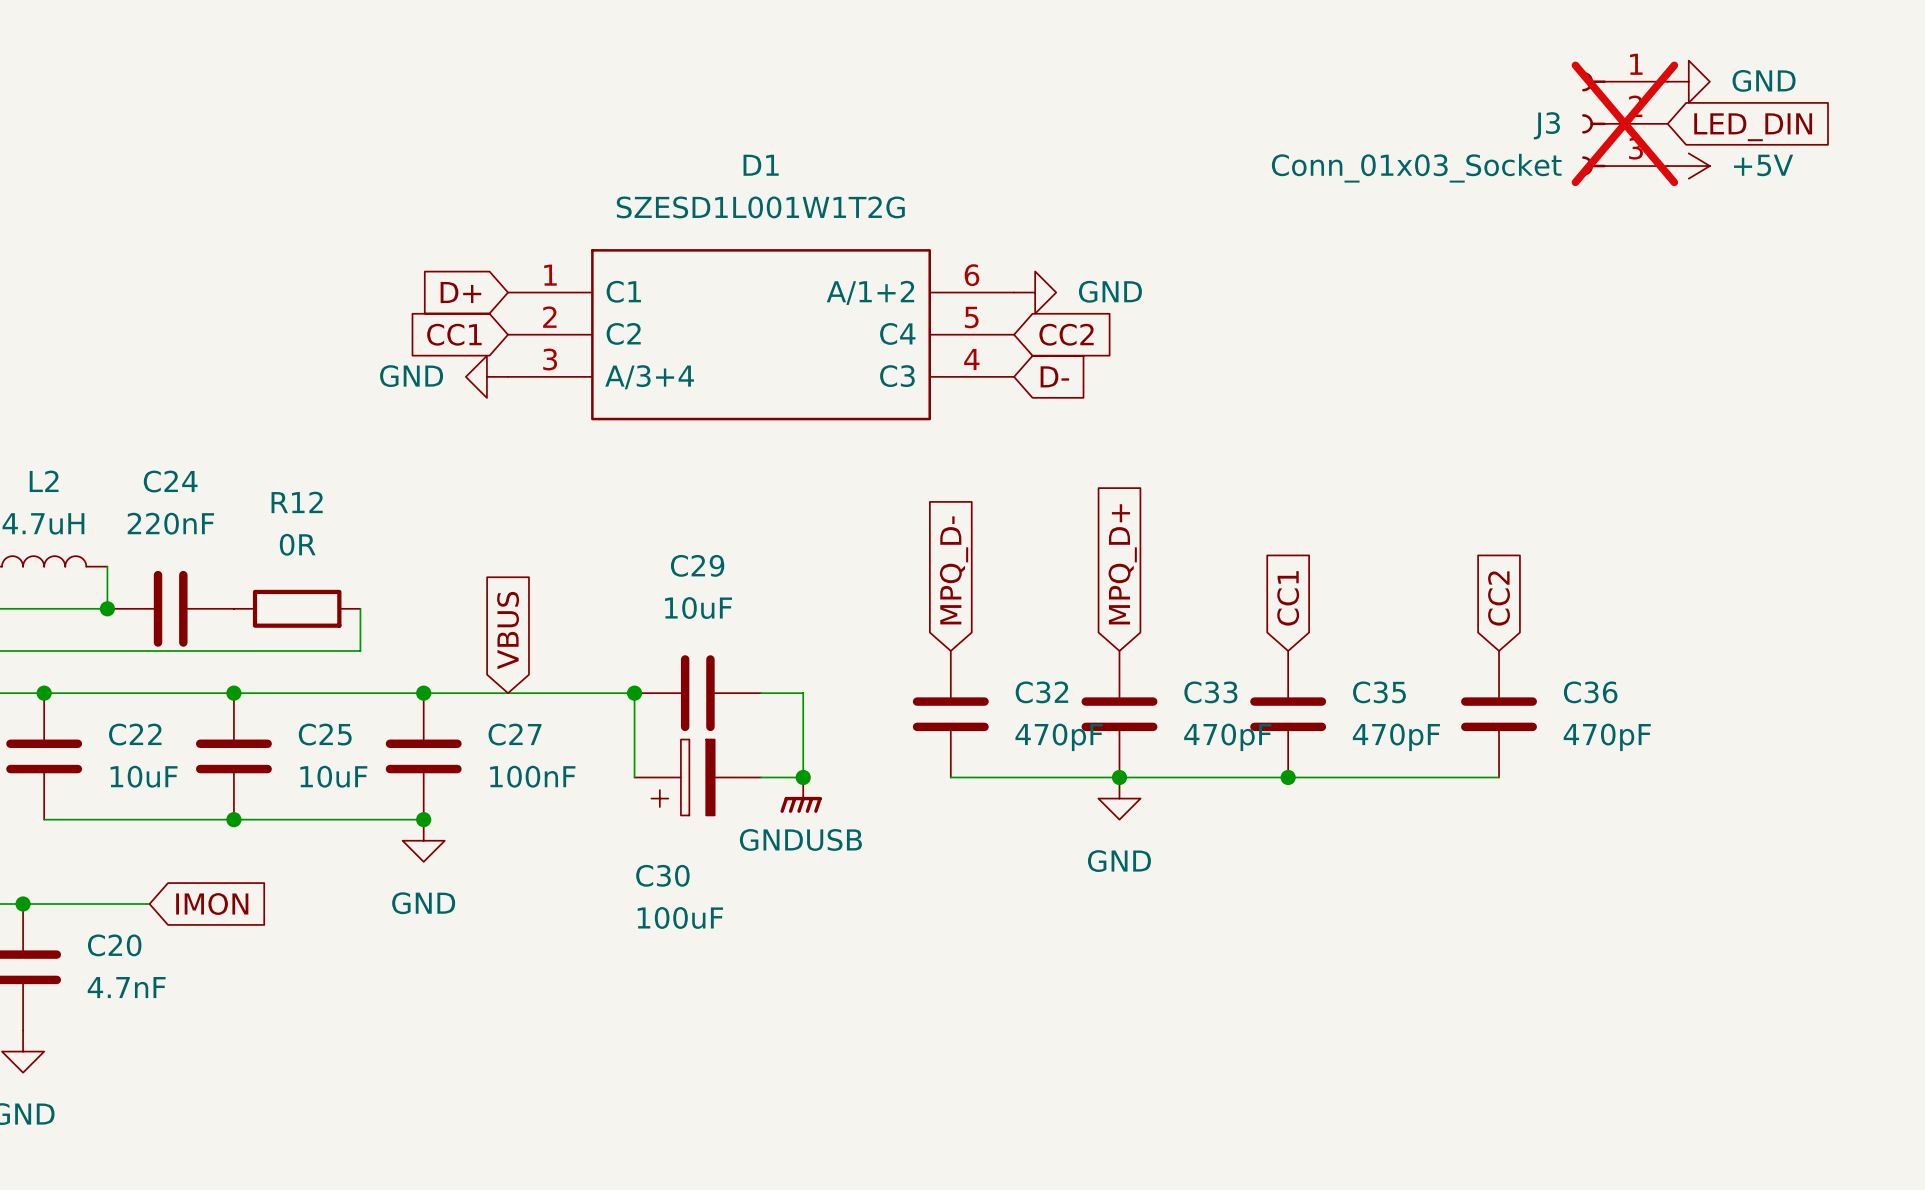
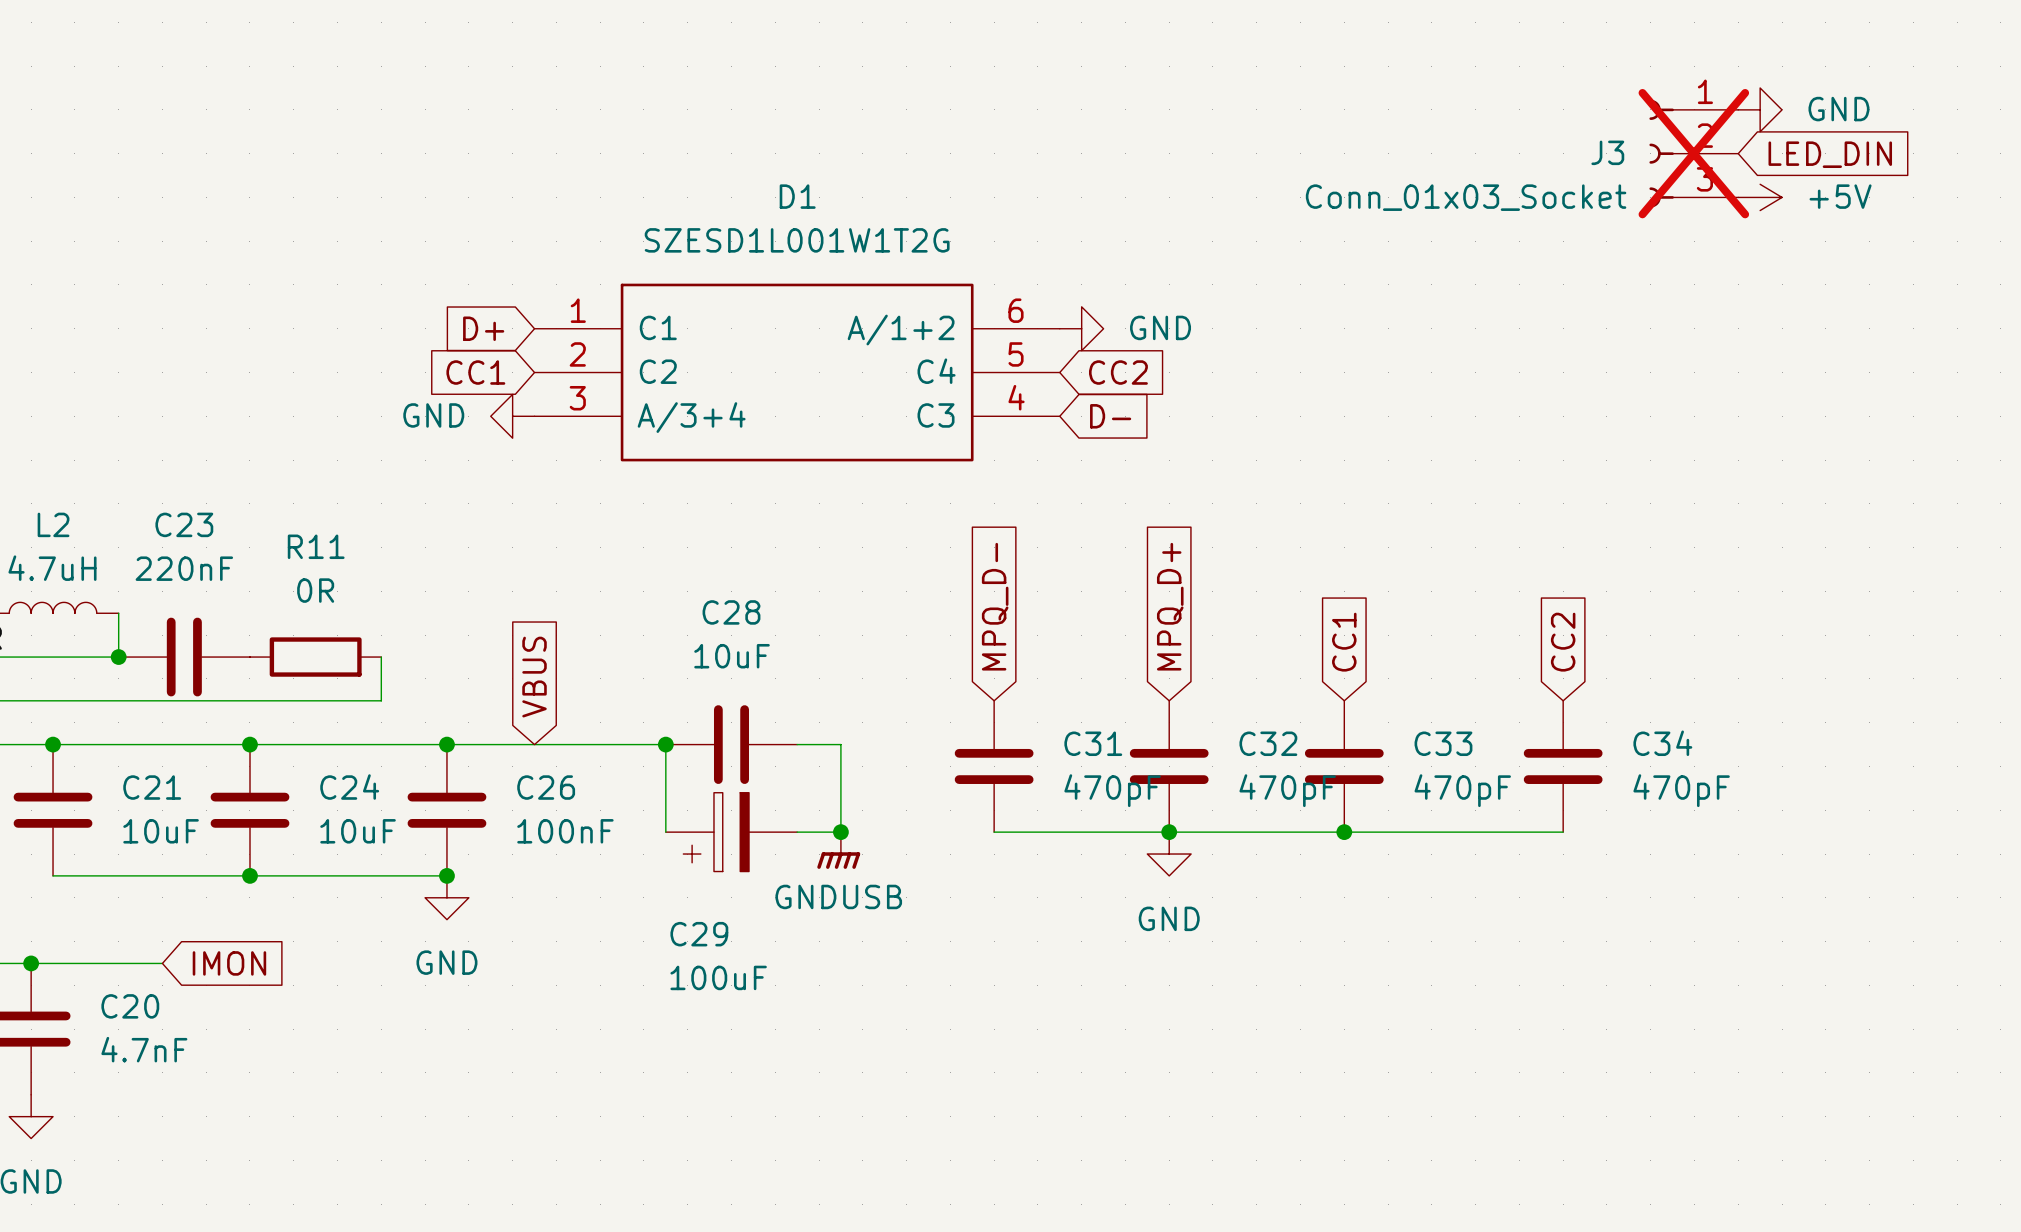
C24 name: C24 (170, 481) -> C23 (184, 524)
R12 name: R12 (297, 502) -> R11 (316, 546)
C29 name: C29 (697, 565) -> C28 (731, 612)
C32 name: C32 (1041, 692) -> C31 (1093, 743)
C33 name: C33 (1210, 692) -> C32 (1268, 743)
C35 name: C35 (1379, 692) -> C33 (1443, 743)
C36 name: C36 (1590, 692) -> C34 (1662, 743)
C22 name: C22 (135, 734) -> C21 (152, 787)
C25 name: C25 (325, 734) -> C24 (349, 787)
C27 name: C27 (515, 734) -> C26 (546, 787)
C30 name: C30 (662, 875) -> C29 (699, 934)

